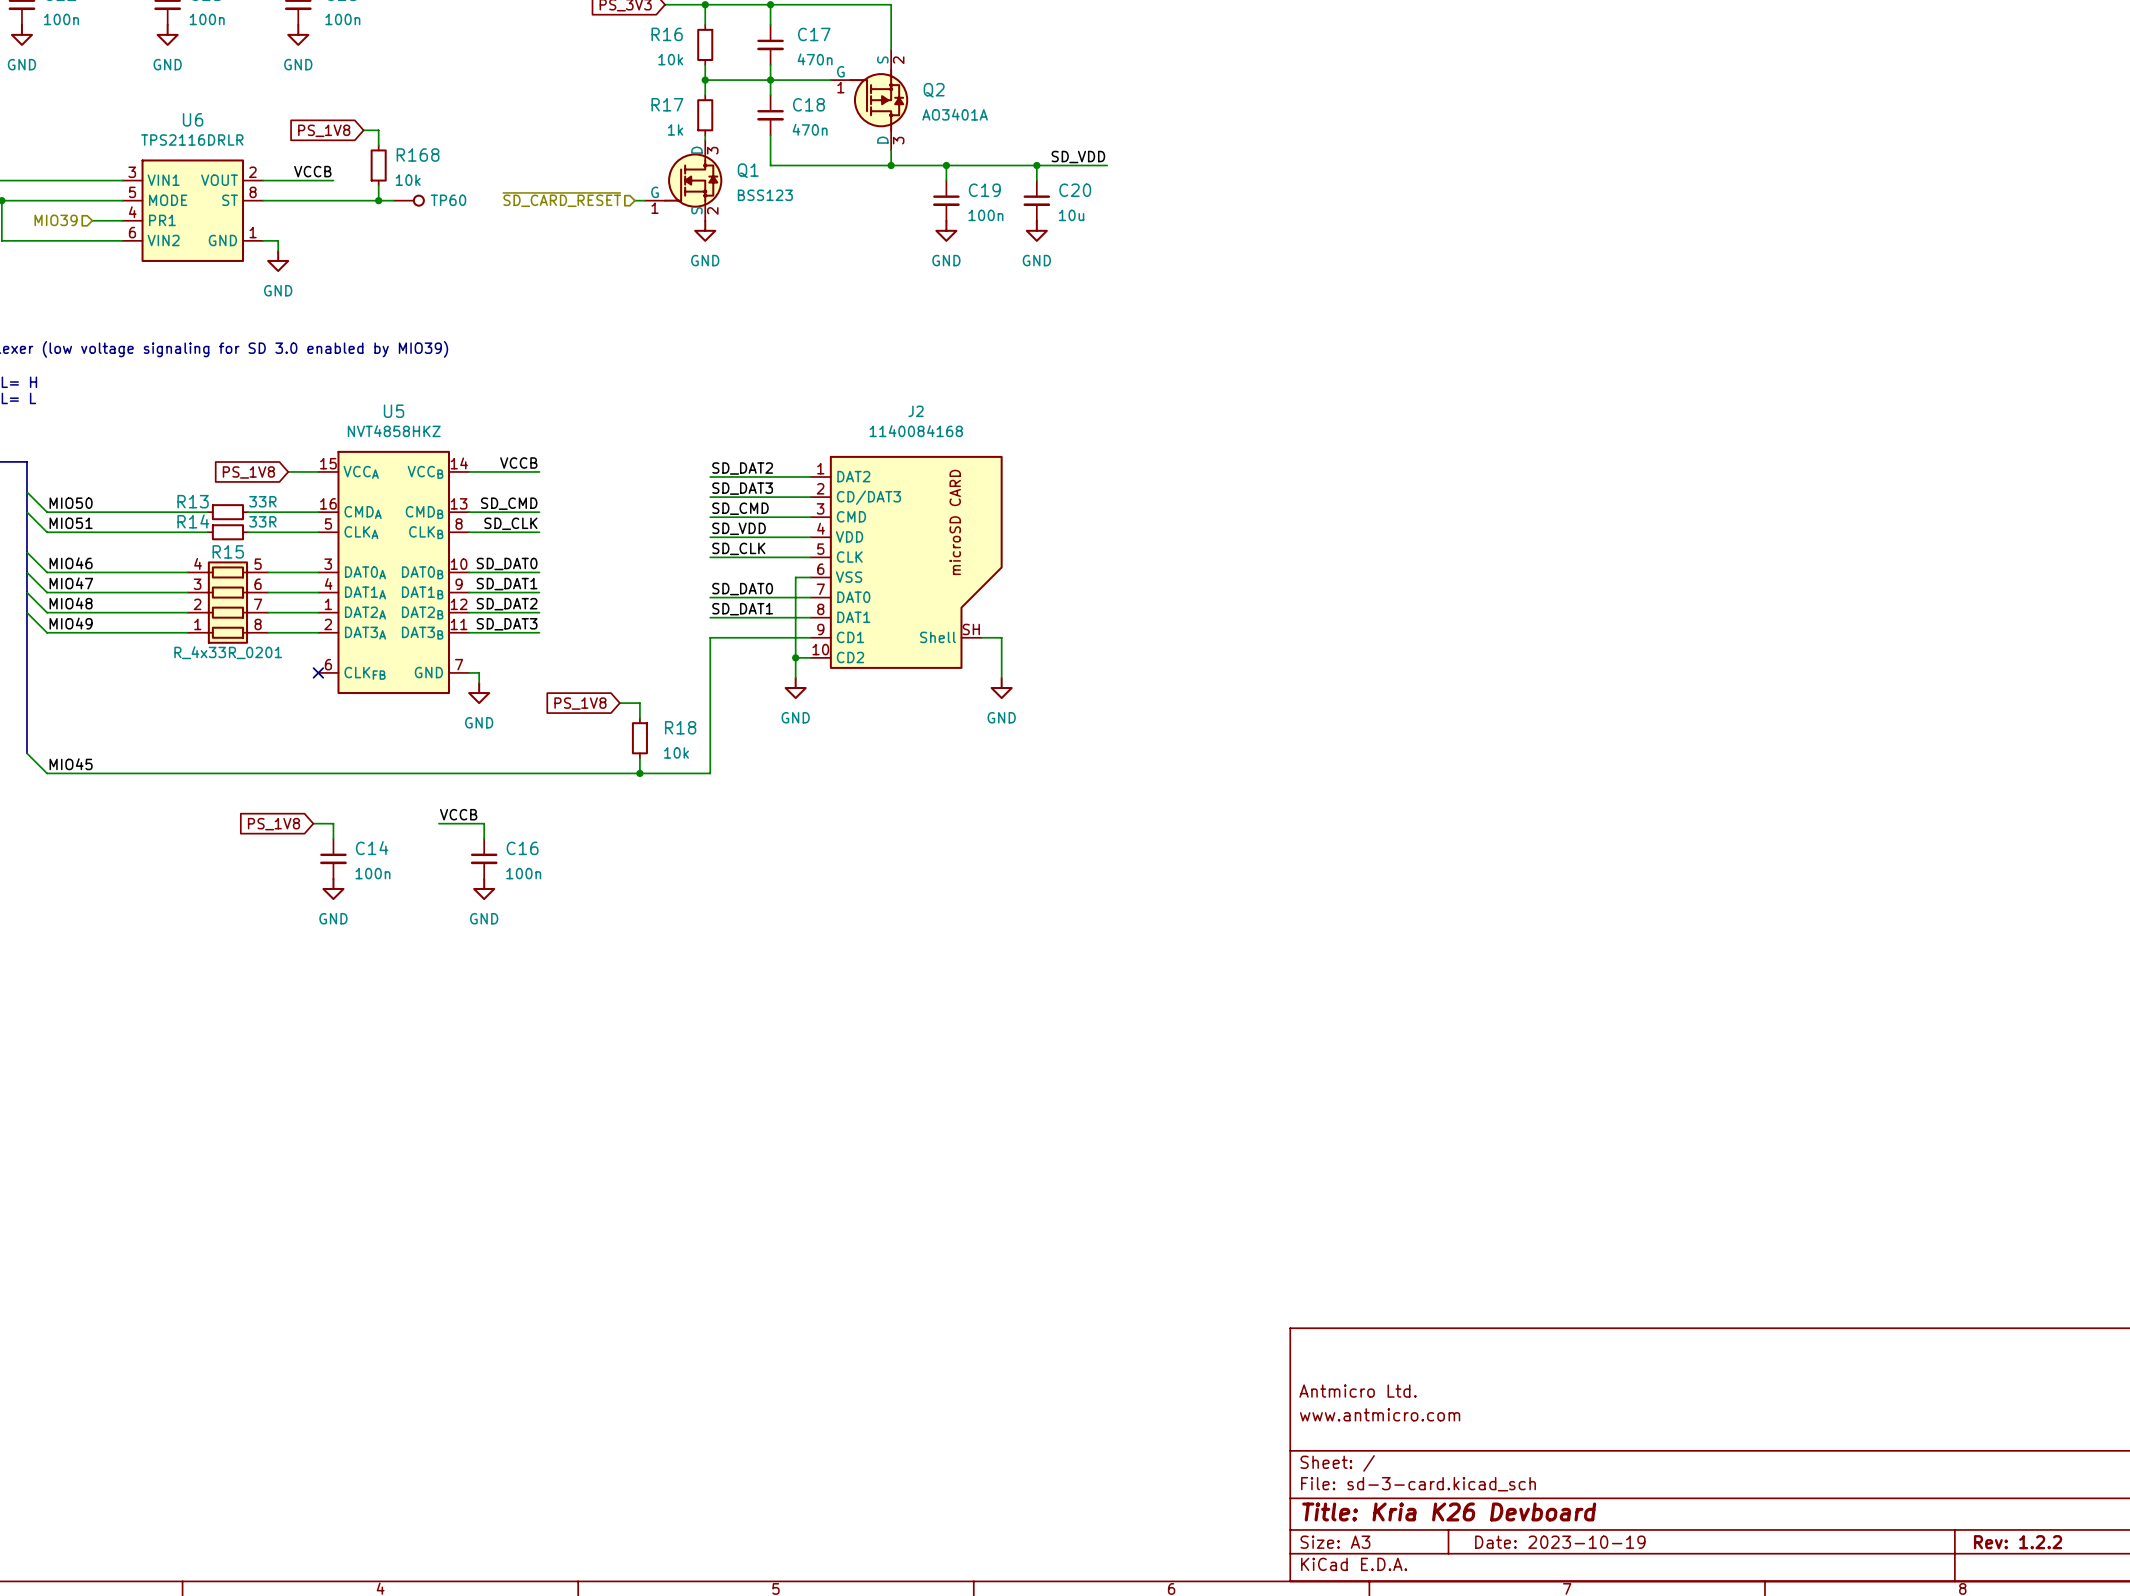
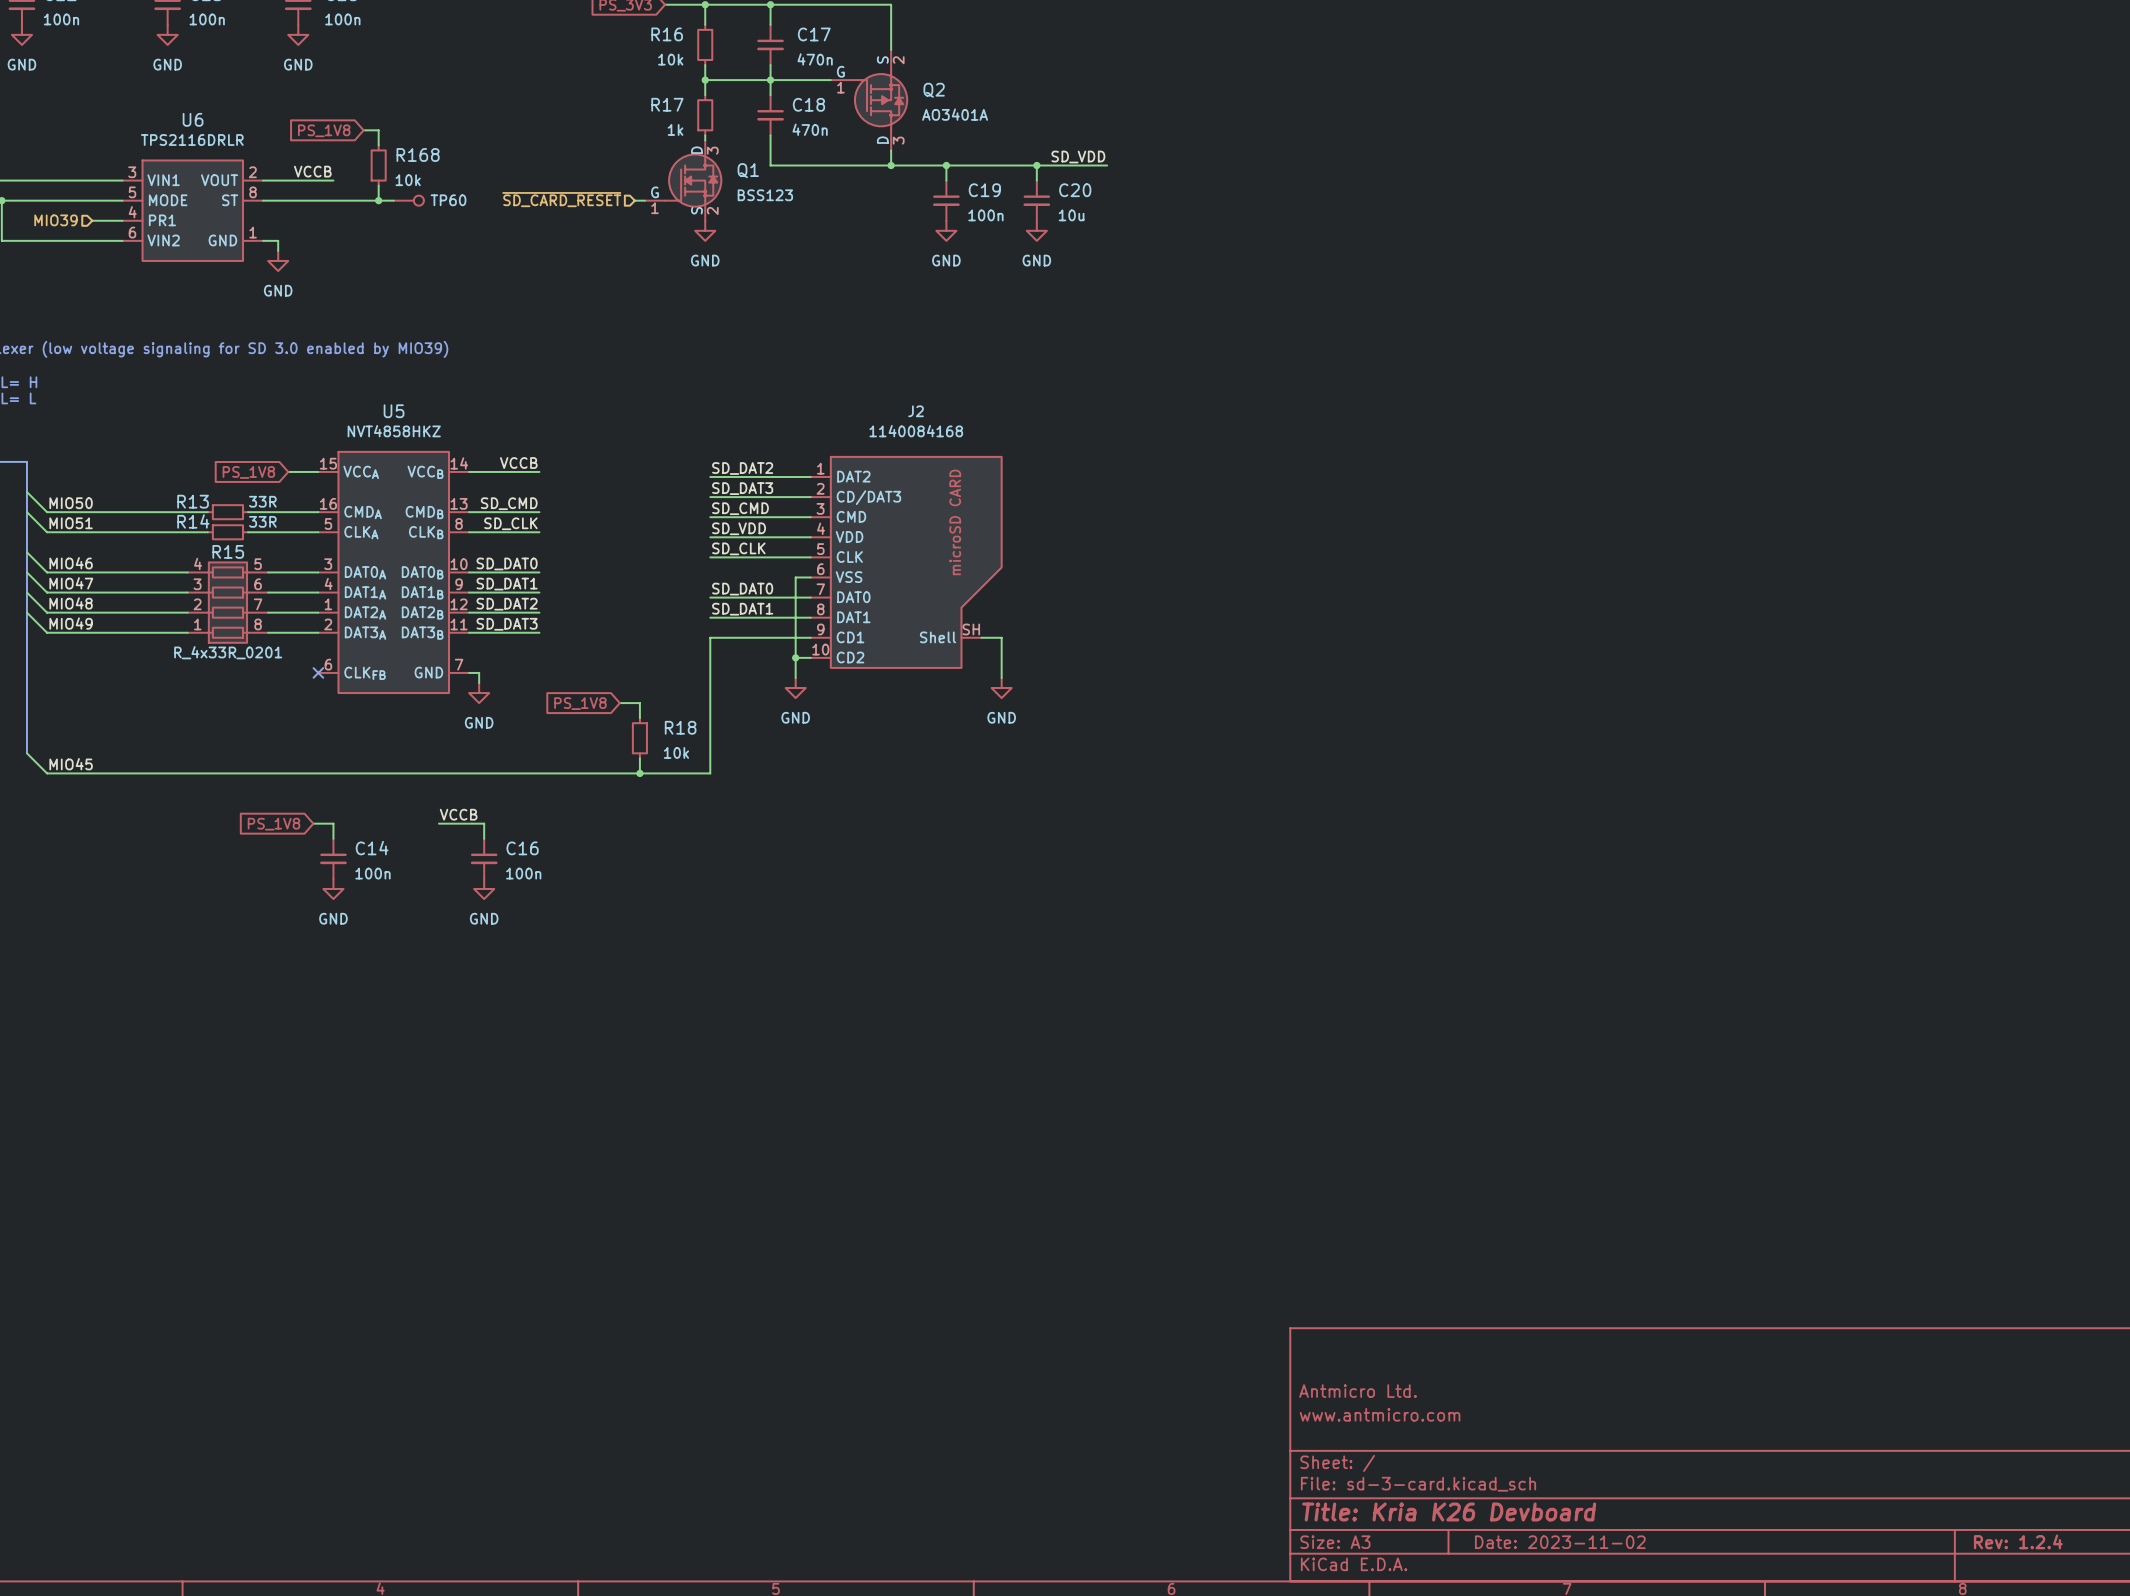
title block: Date: 2023-10-19 (1560, 1542) -> Date: 2023-11-02 (1560, 1542)
title block: Rev: 1.2.2 (2018, 1542) -> Rev: 1.2.4 (2018, 1541)

